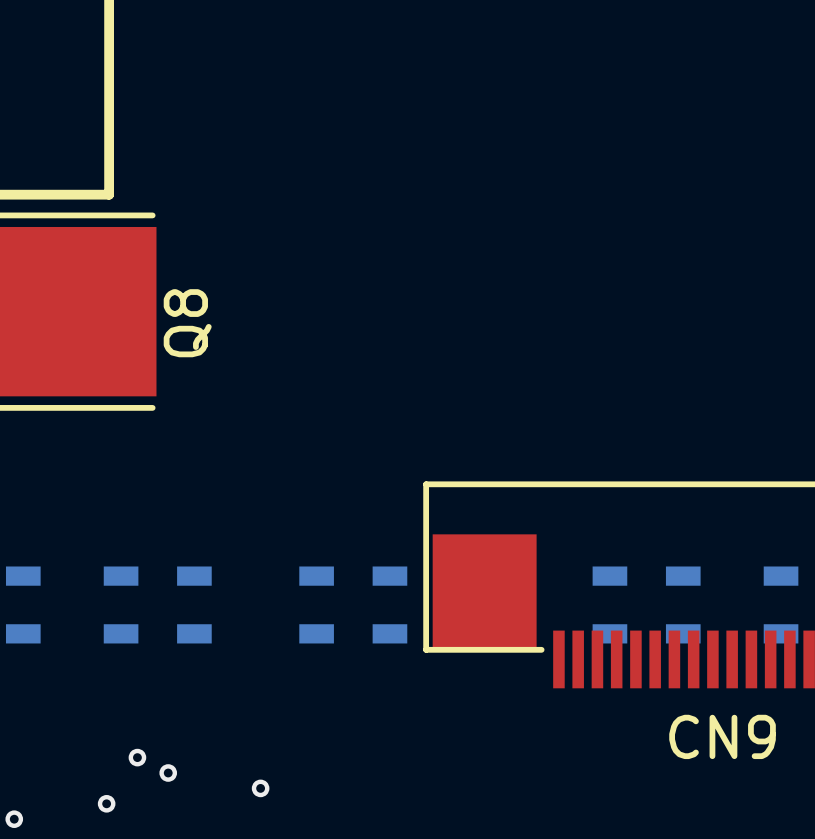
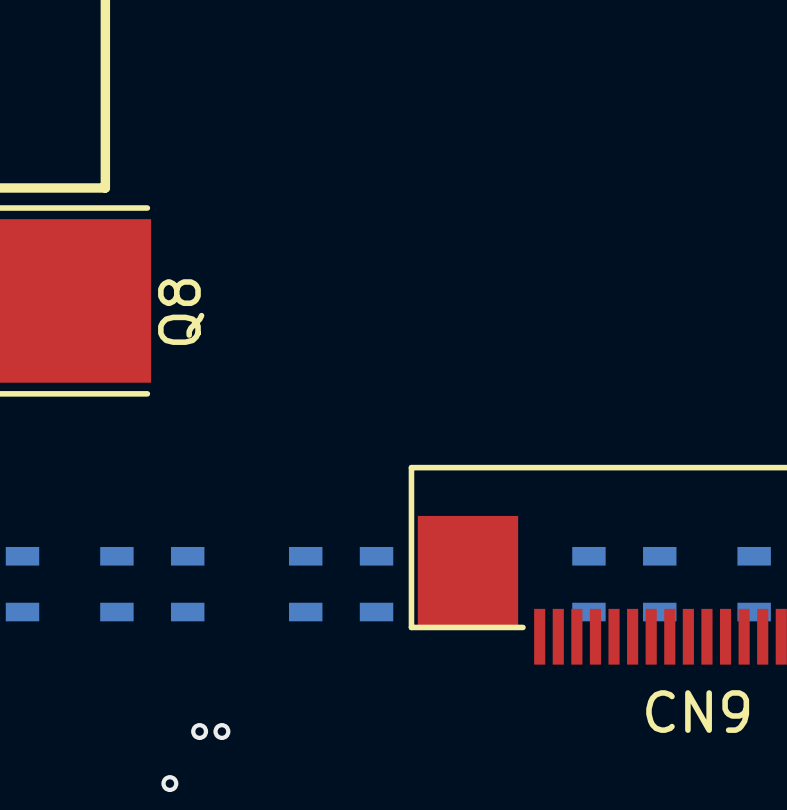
via: (137, 757) -> none
via: none -> (199, 731)
via: none -> (221, 731)
via: (168, 773) -> none
via: (260, 788) -> none
via: (106, 803) -> none
via: none -> (169, 783)
via: (14, 819) -> none

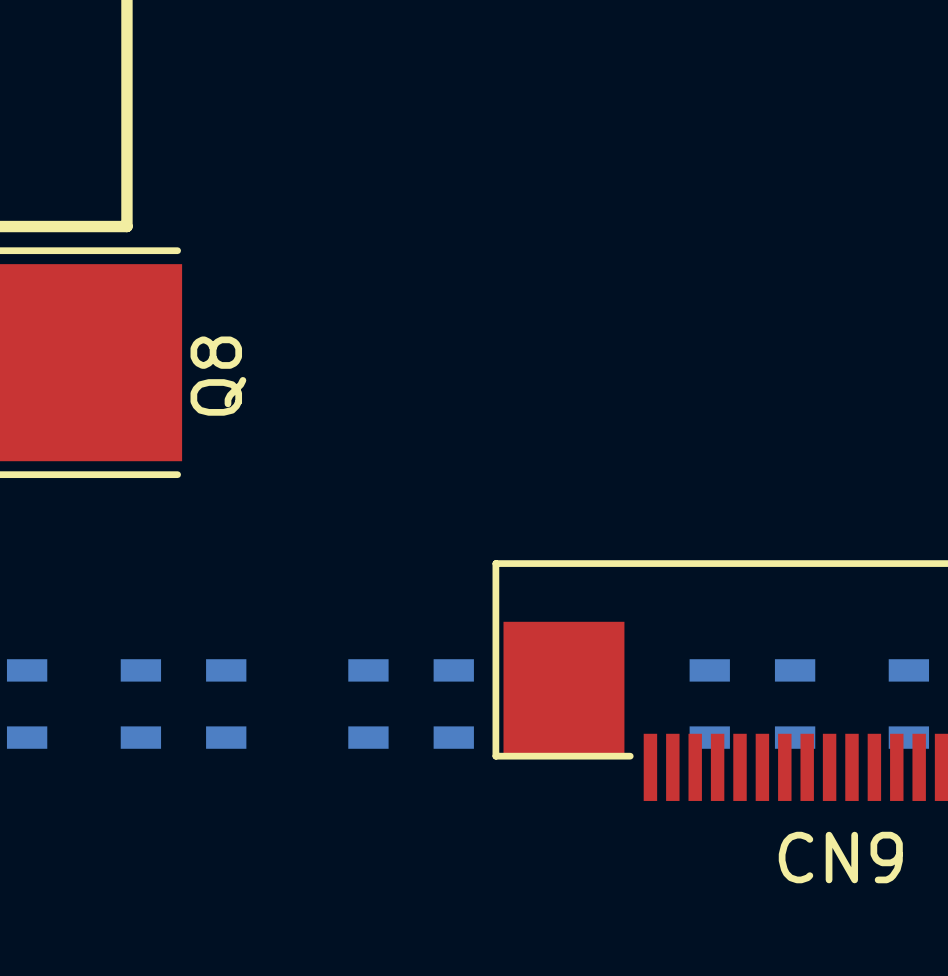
via: (199, 731) -> none
via: (221, 731) -> none
via: (169, 783) -> none

